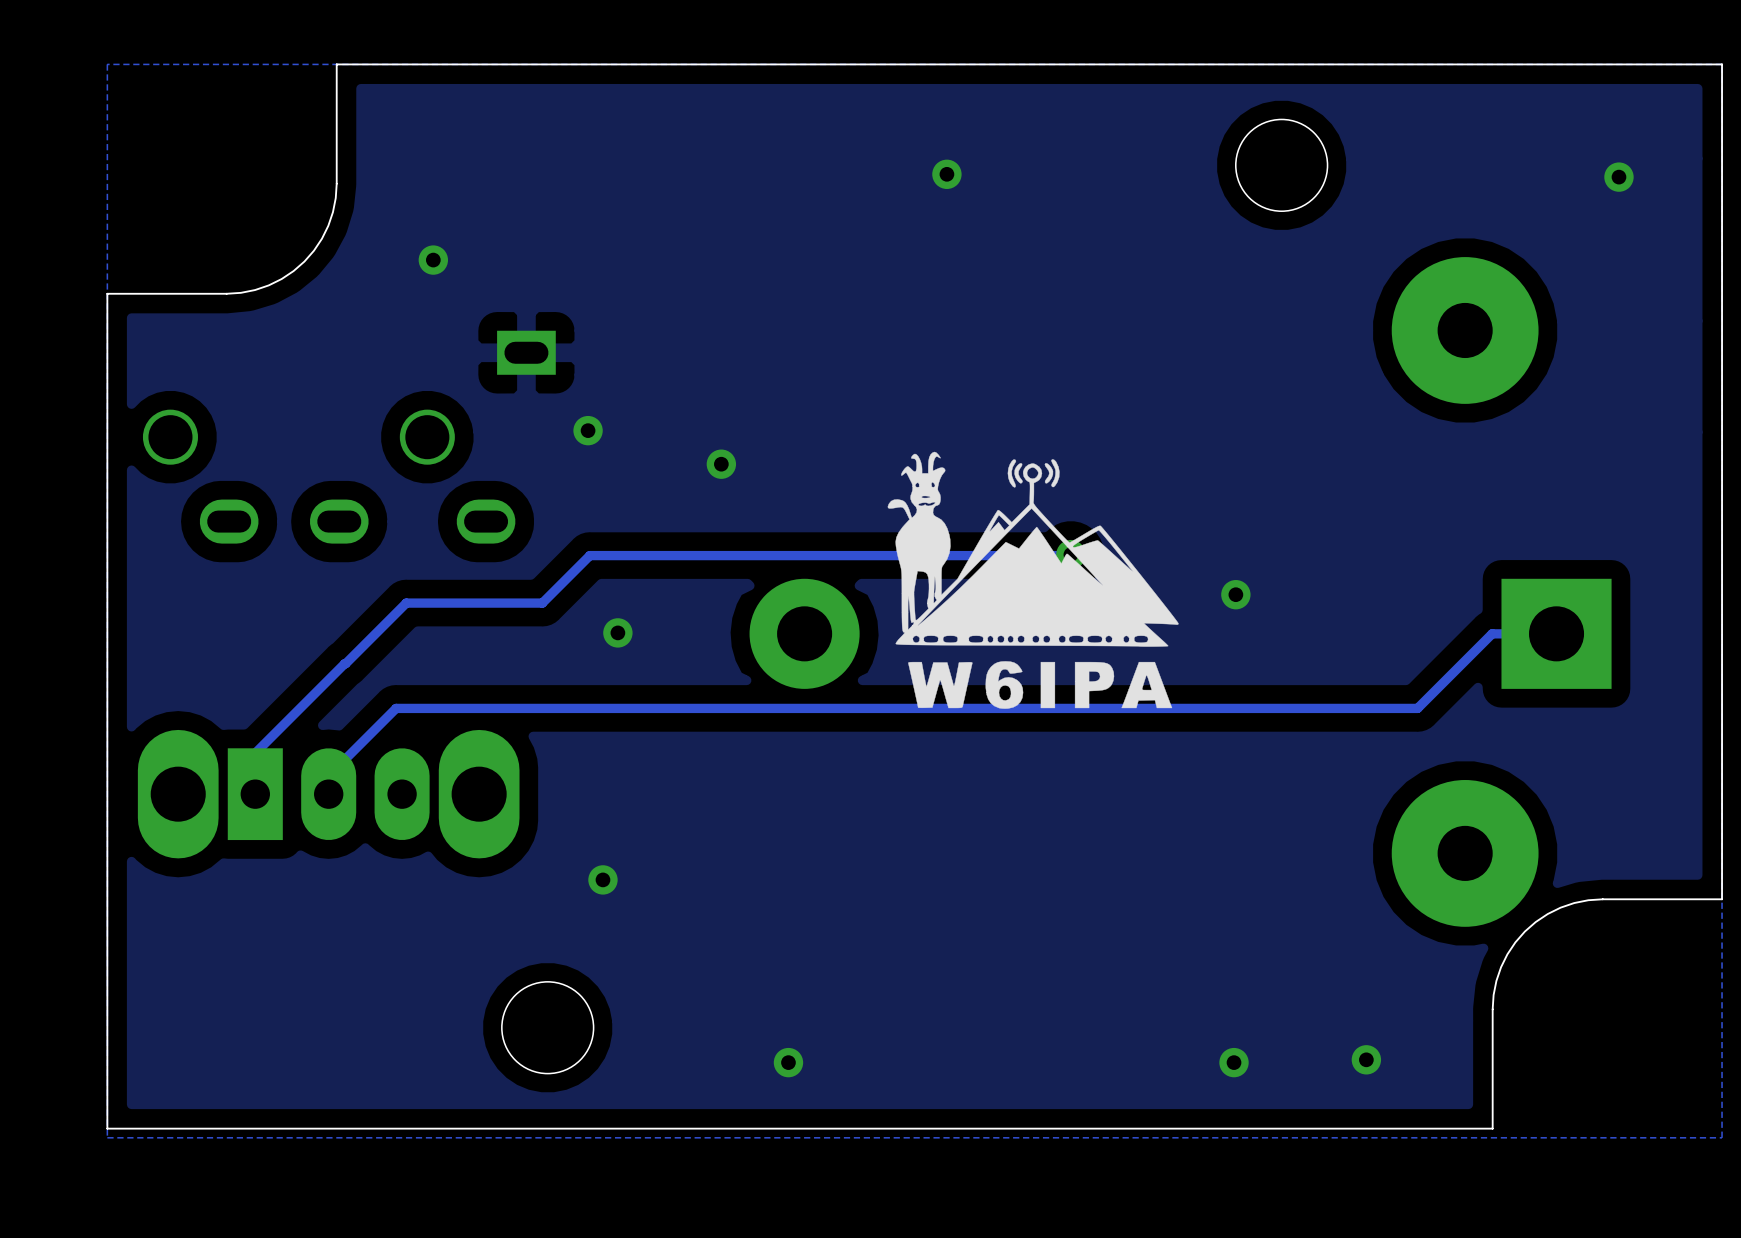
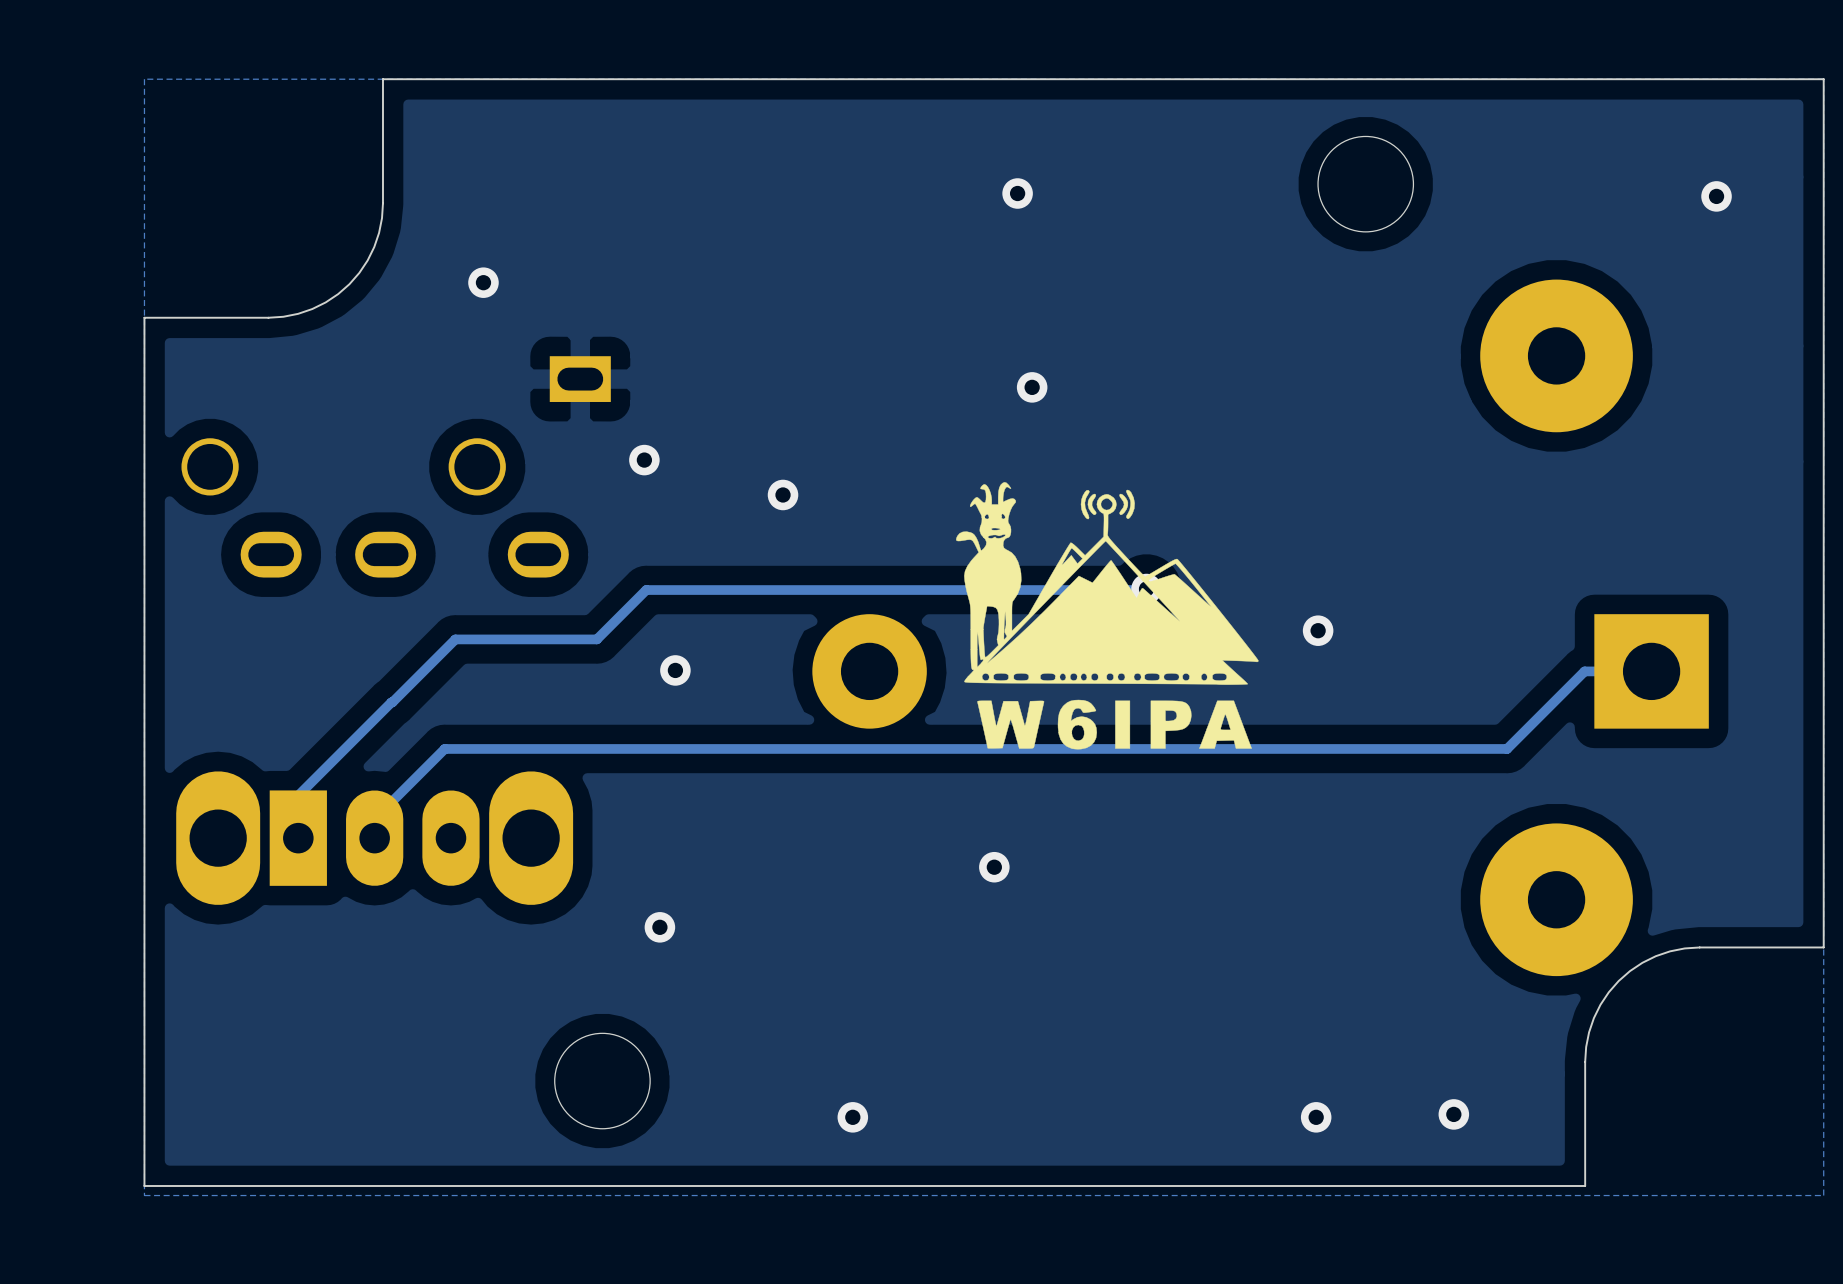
via: none -> (1032, 387)
via: none -> (994, 867)

